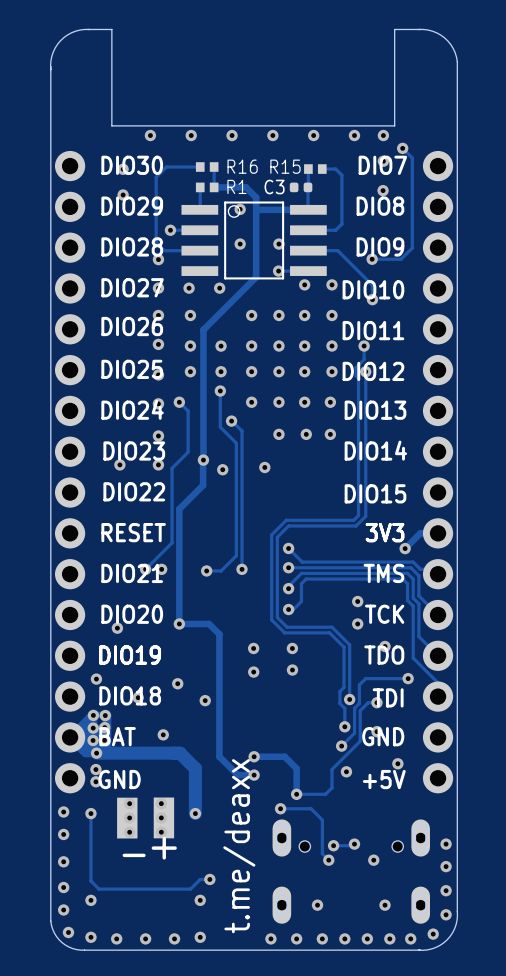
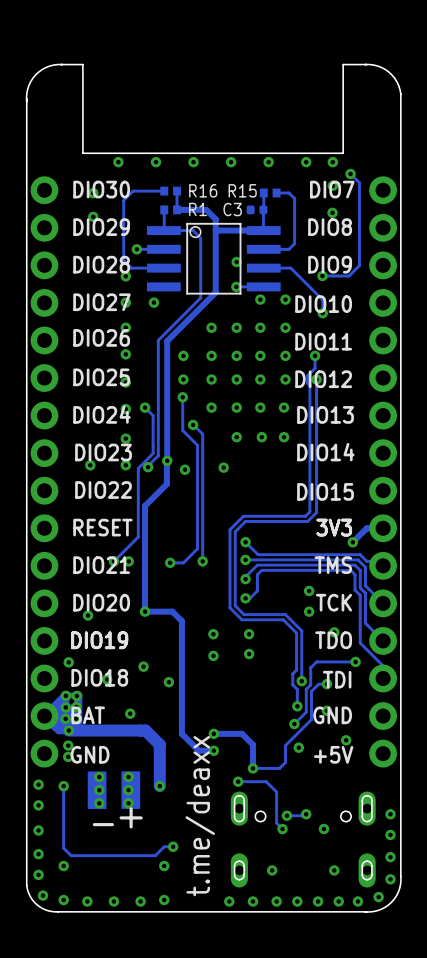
track: none -> (163, 230) (193, 230) (200, 238) (200, 298) (158, 340) (158, 455) (148, 467)
via: (240, 209) -> none
via: (240, 244) -> none
via: (219, 288) -> none
via: (190, 315) -> none
via: (190, 346) -> none
via: (190, 371) -> none
via: none -> (148, 467)

